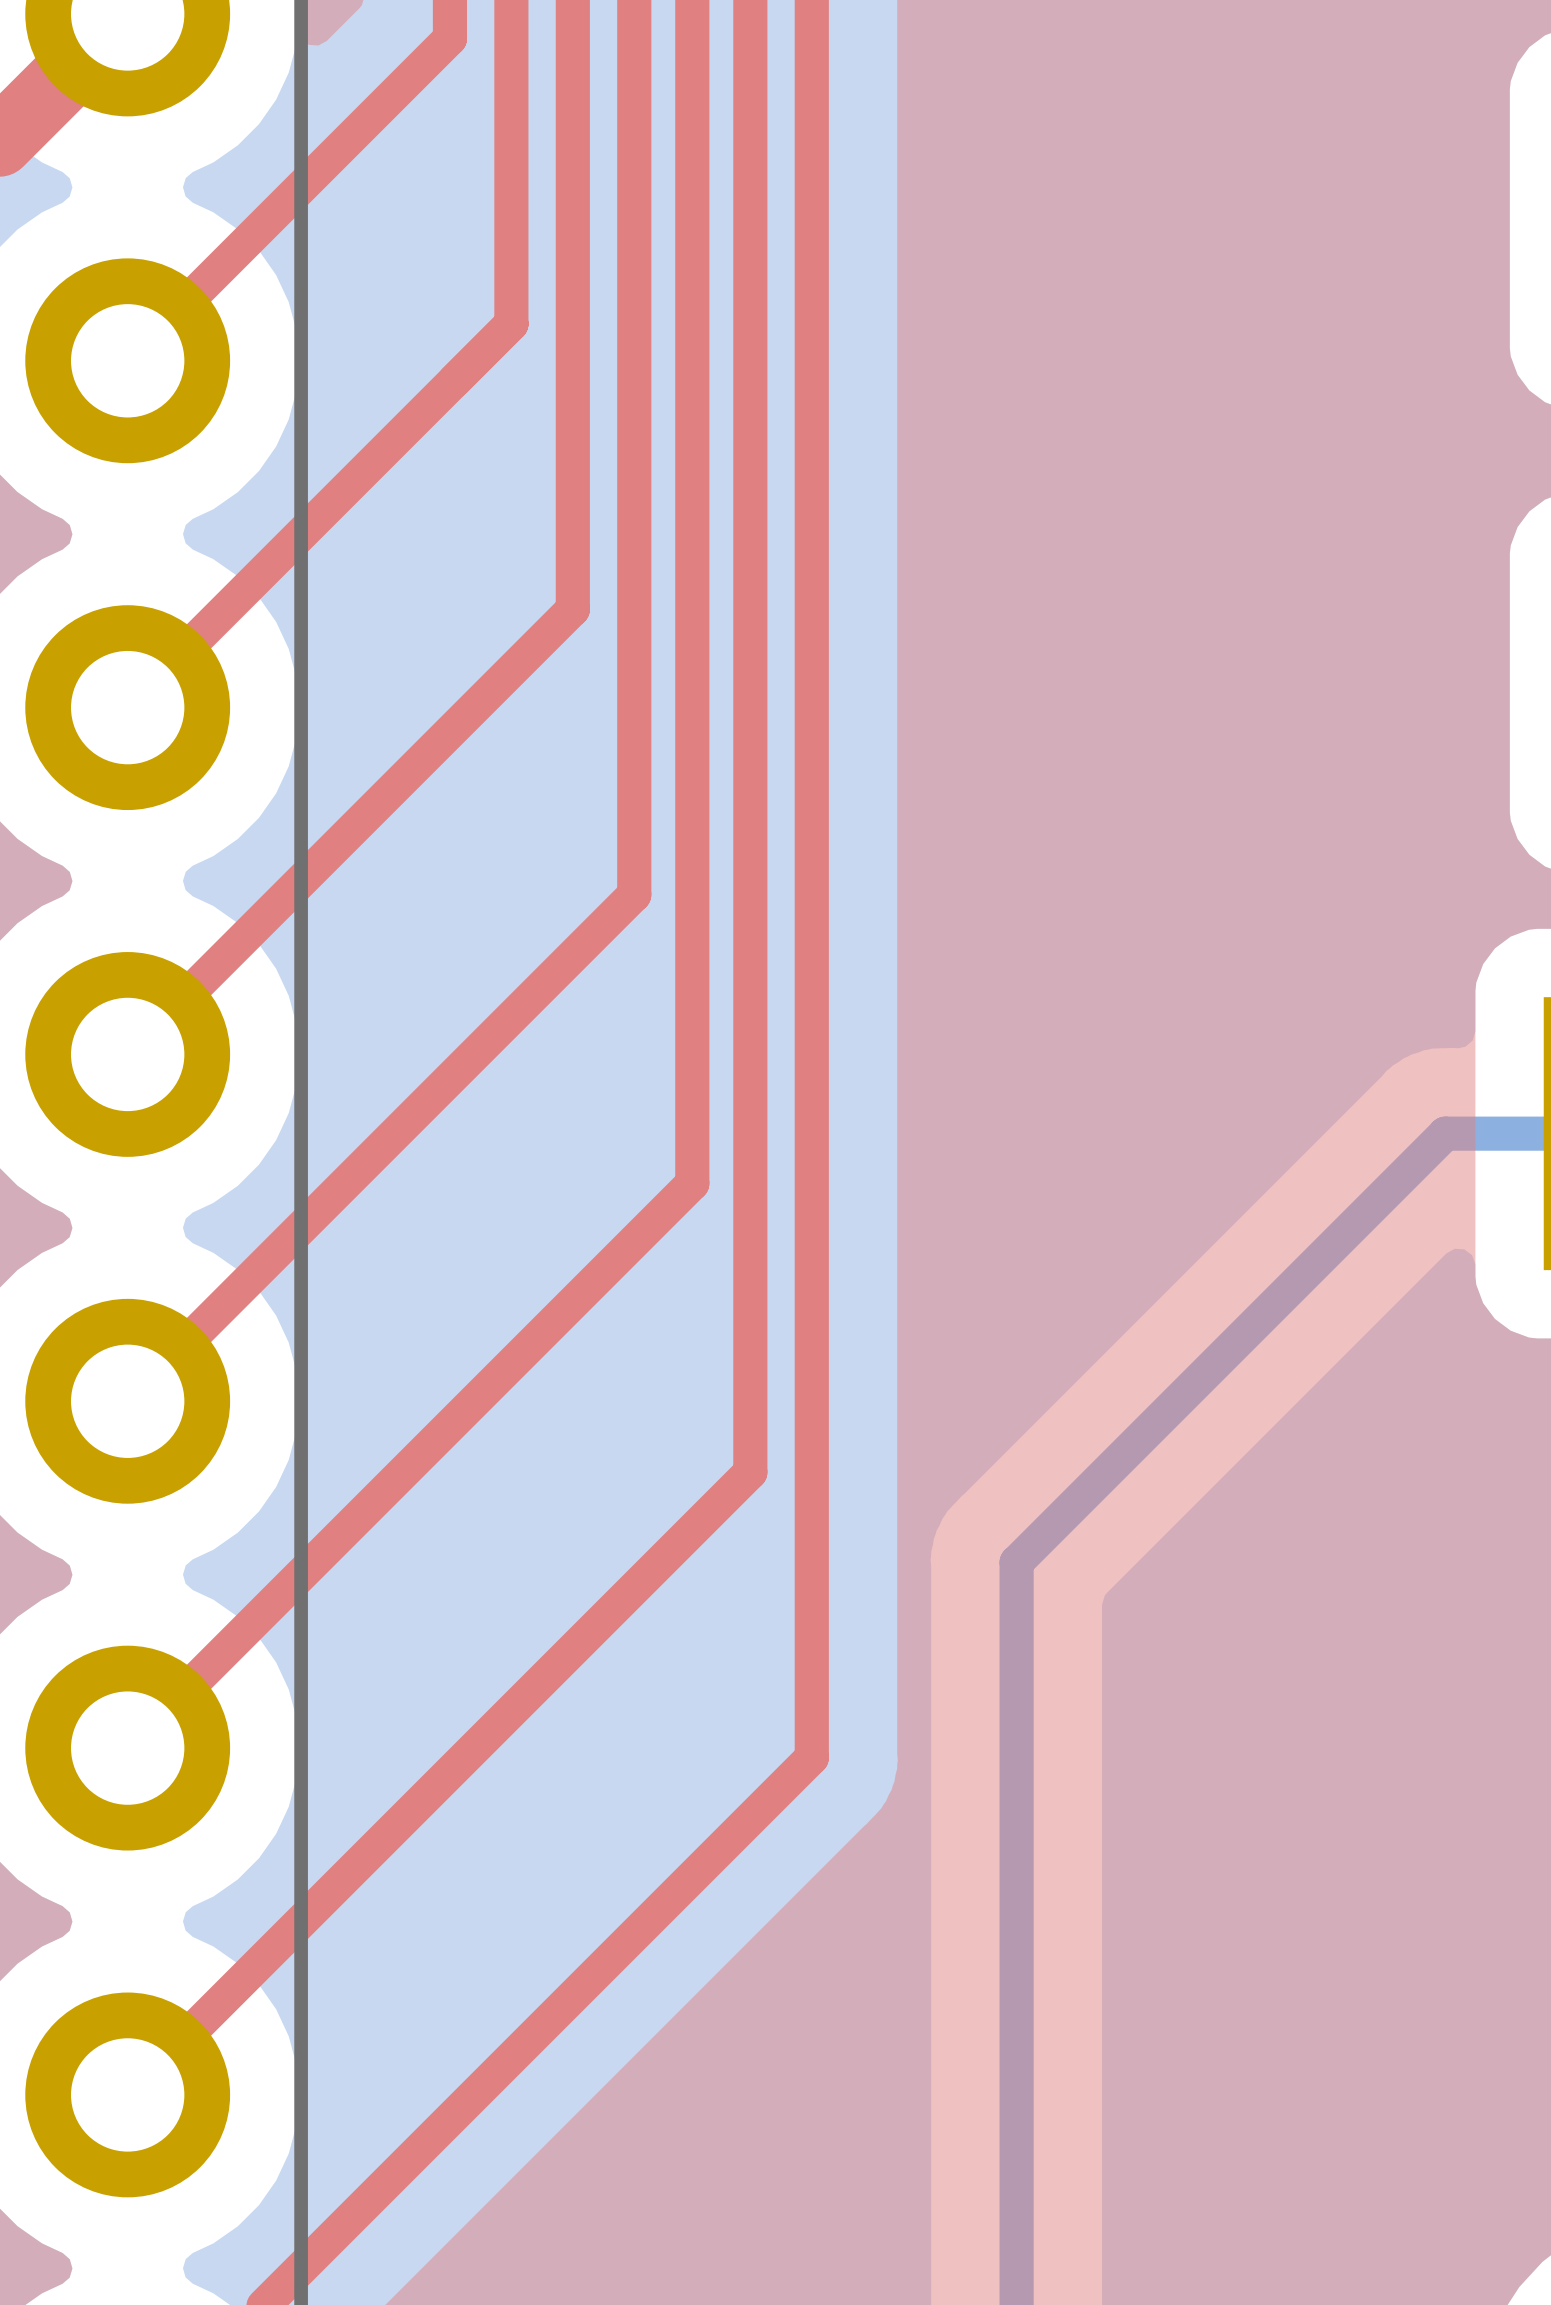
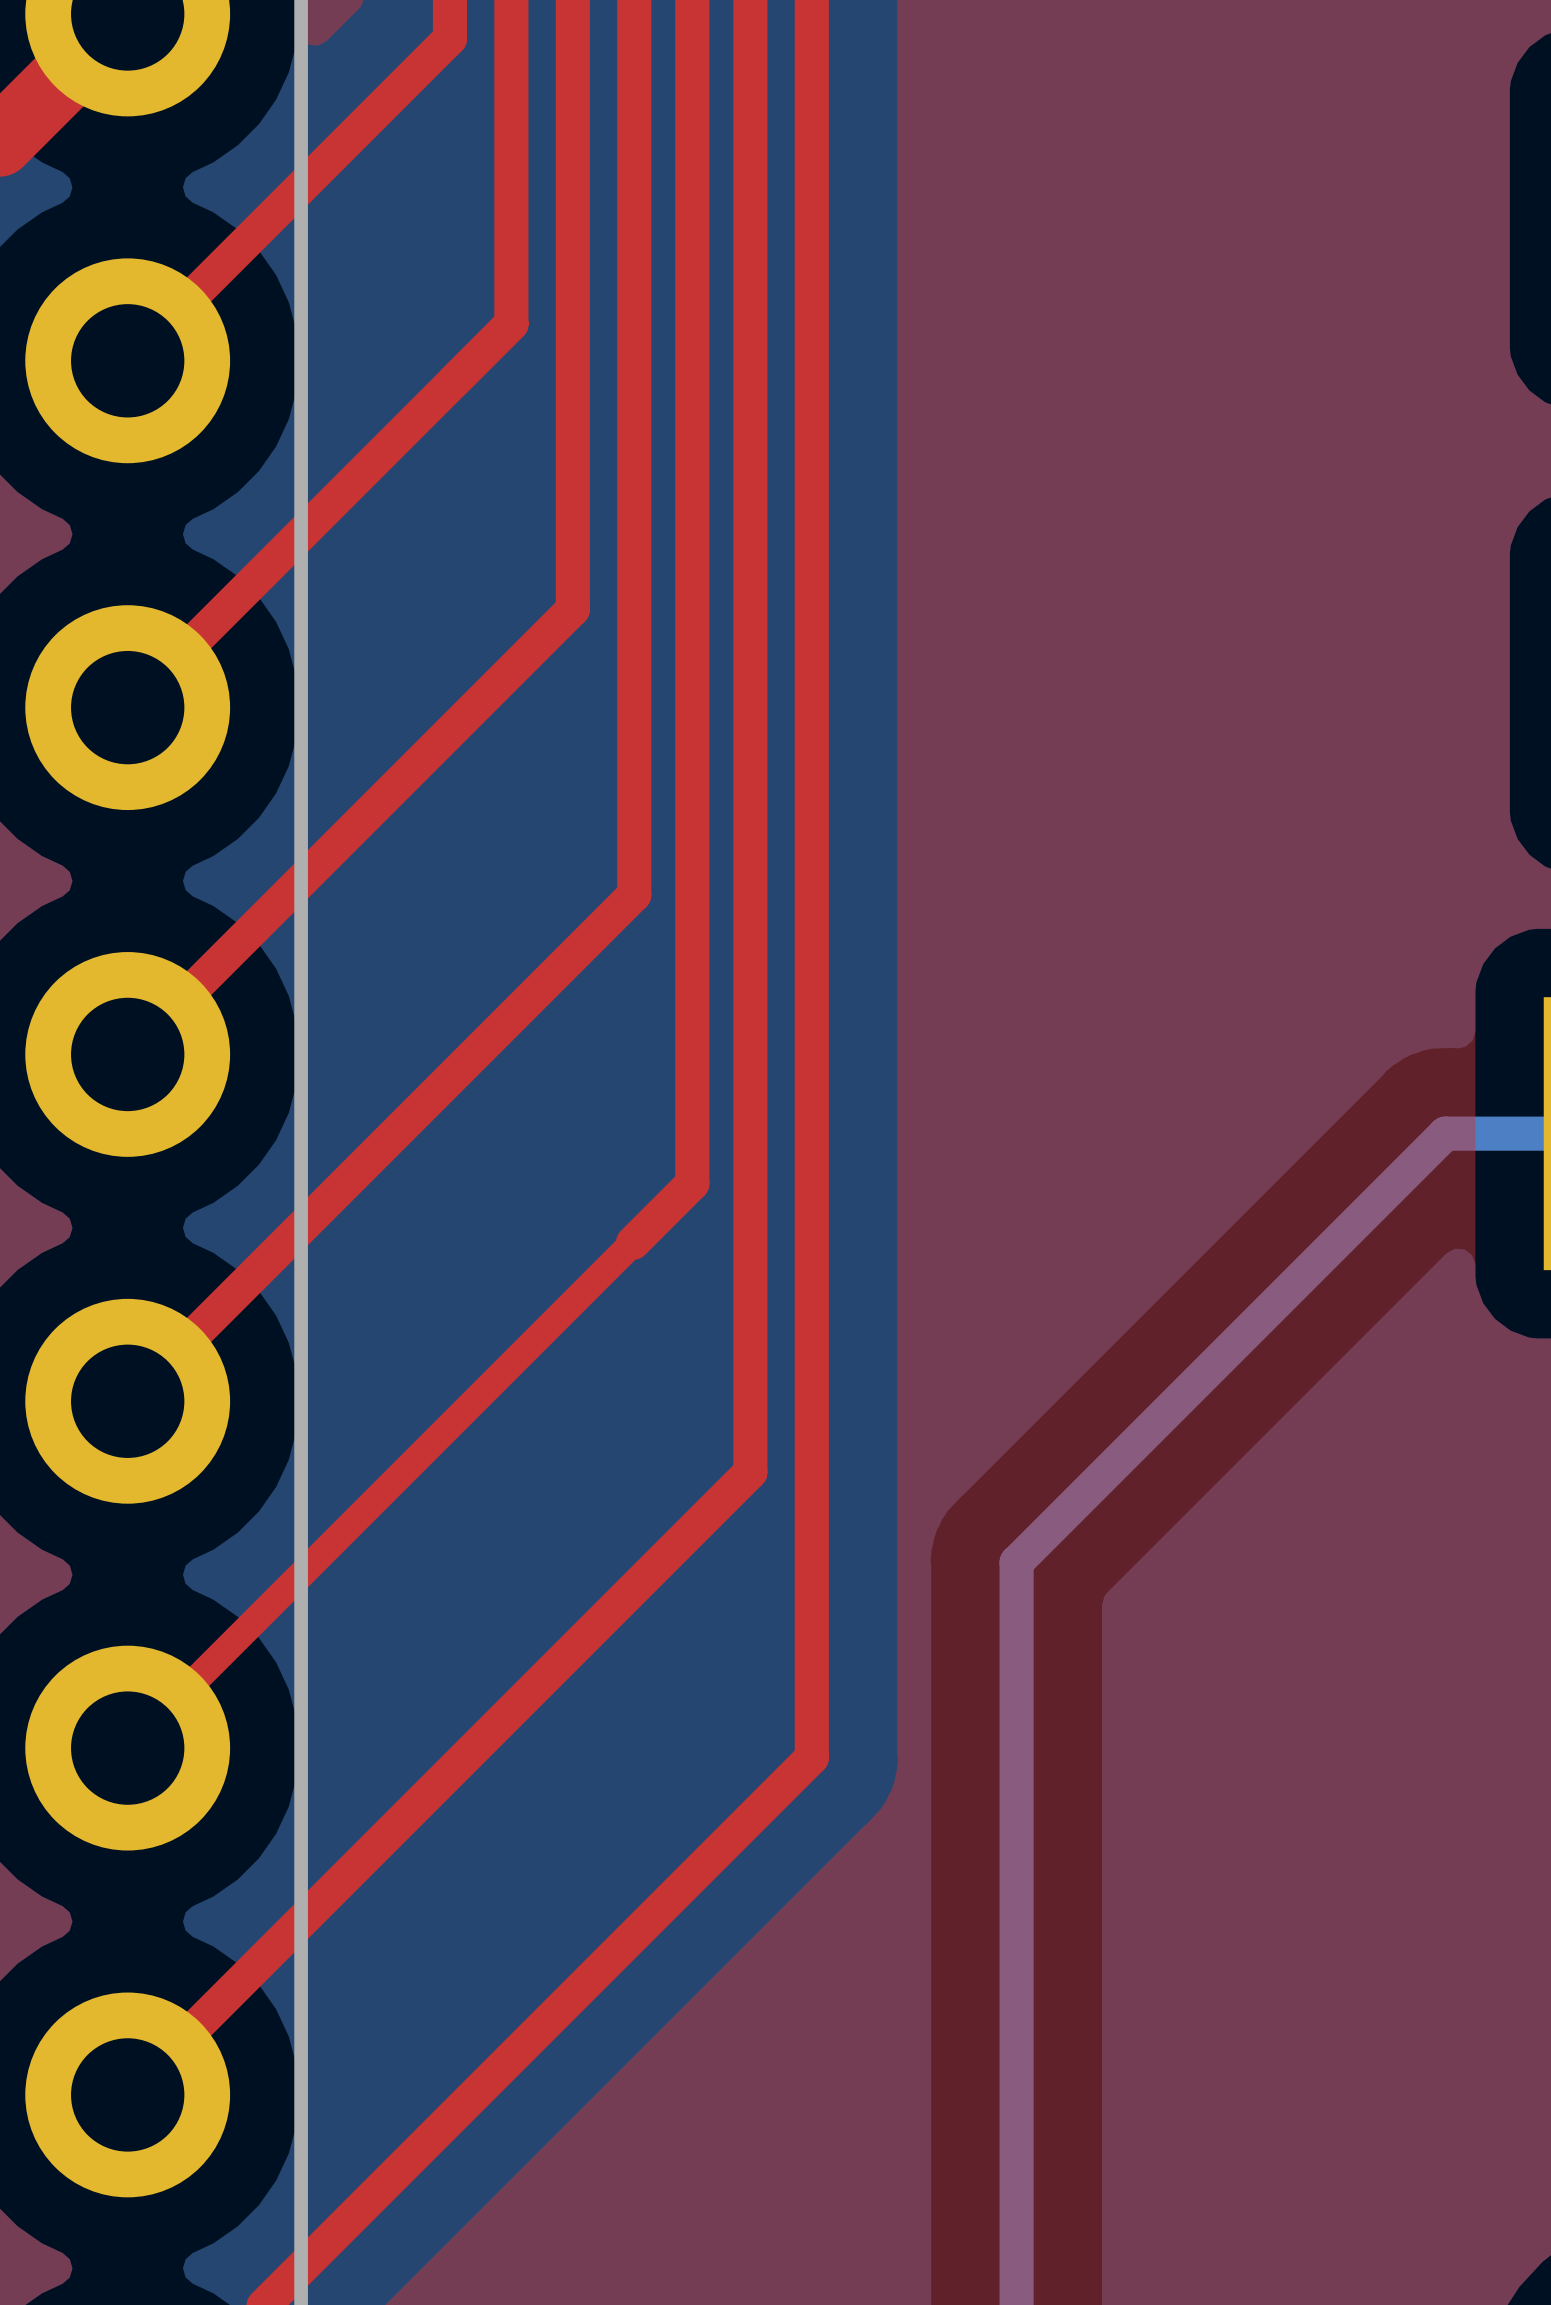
top track width: thick (632, 1242) (127, 1748) -> thin (632, 1242) (127, 1748)

